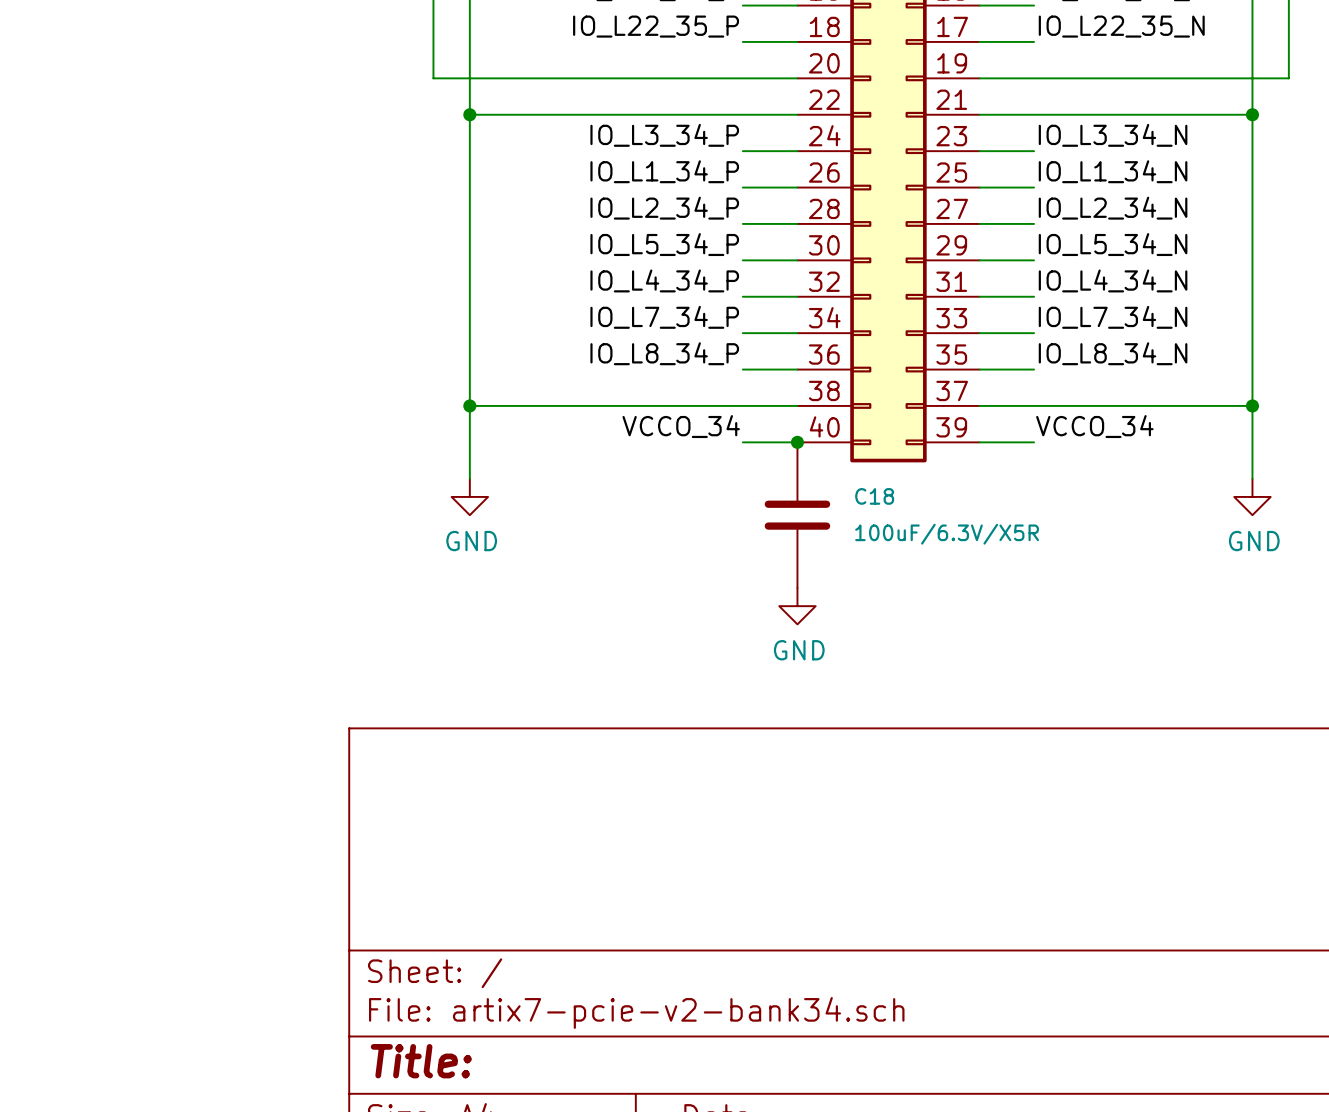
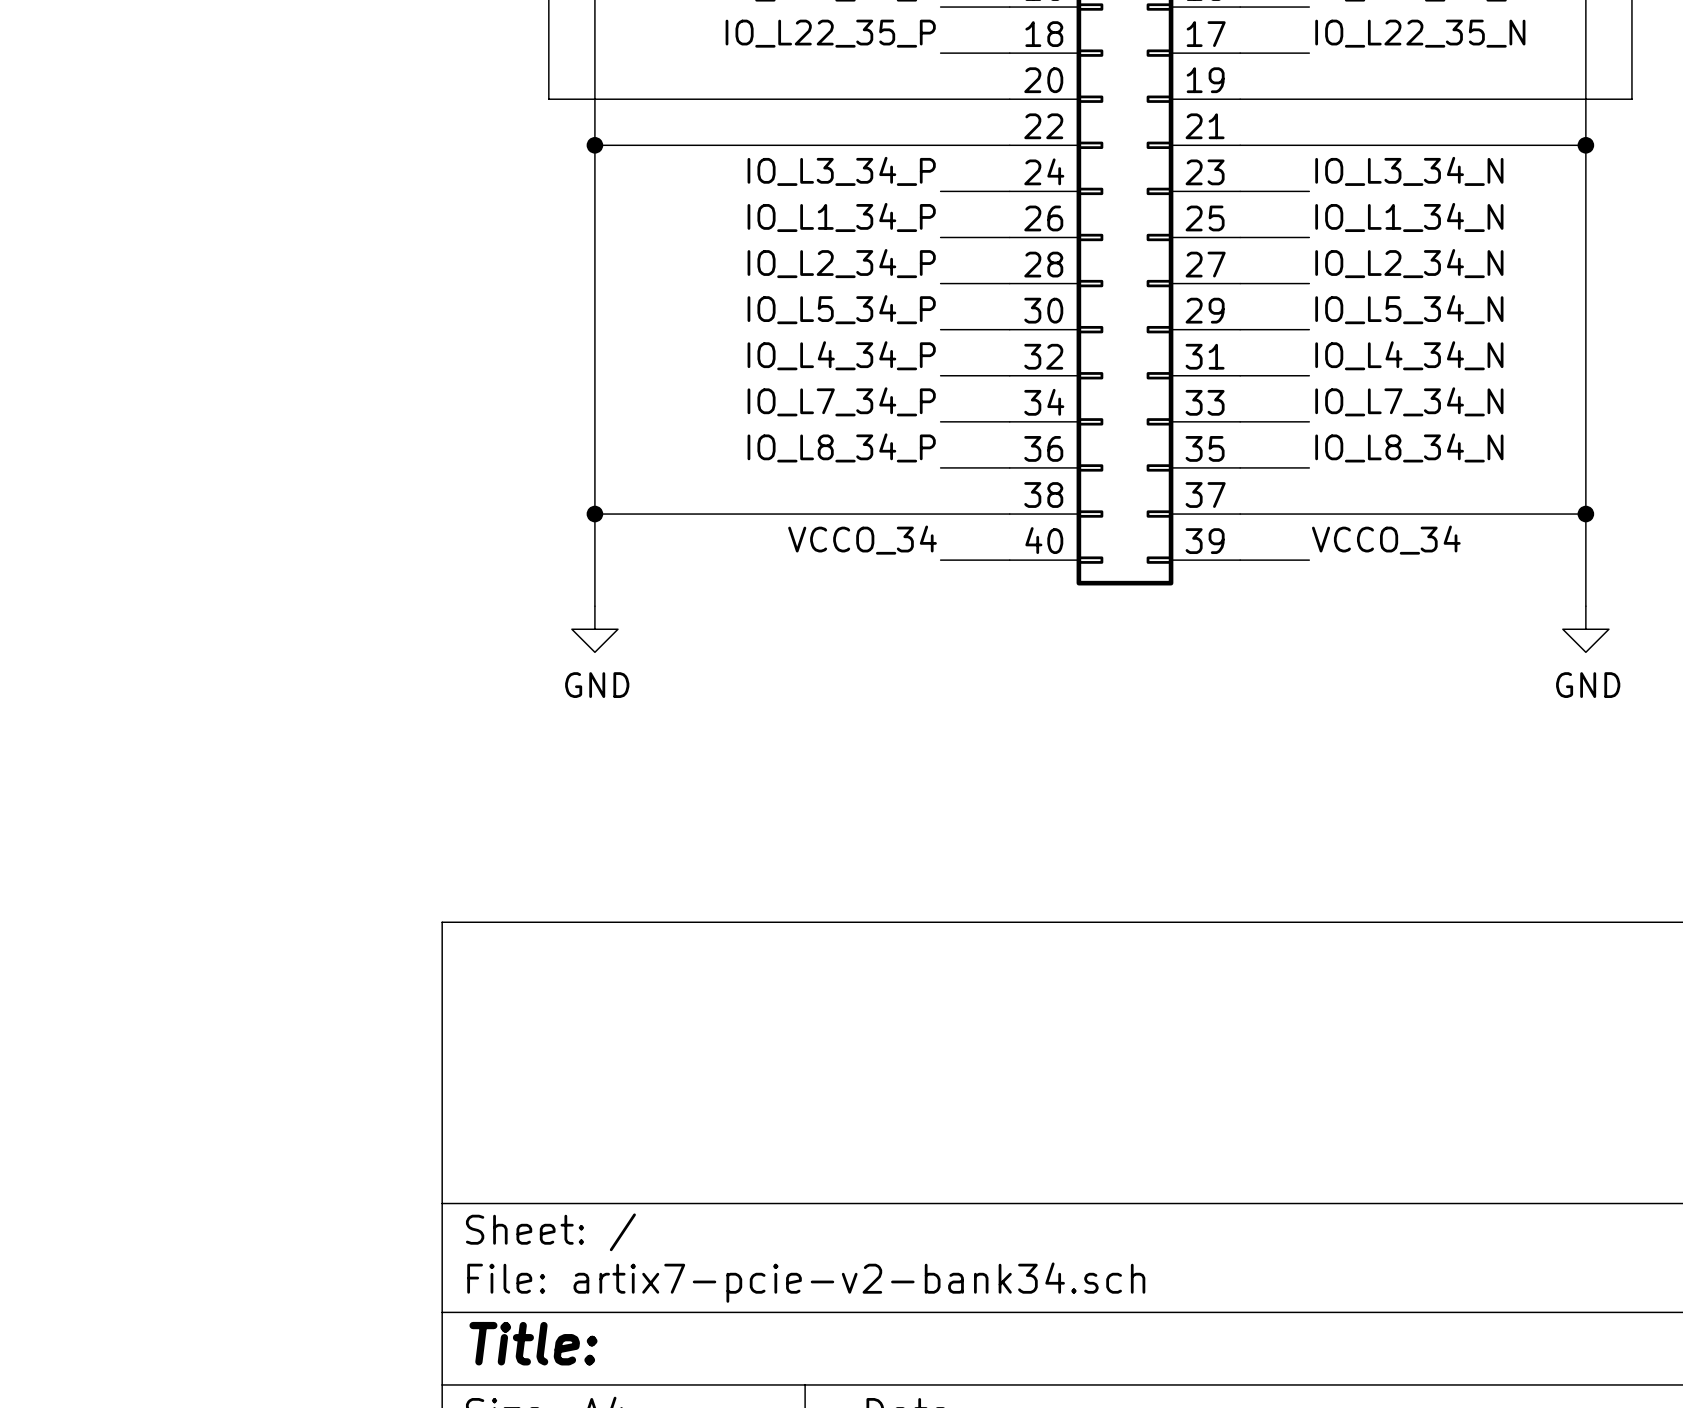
junction: (797, 442) -> none
C18: 100uF/6.3V/X5R (797, 515) -> none
power symbol: GND (797, 606) -> none

